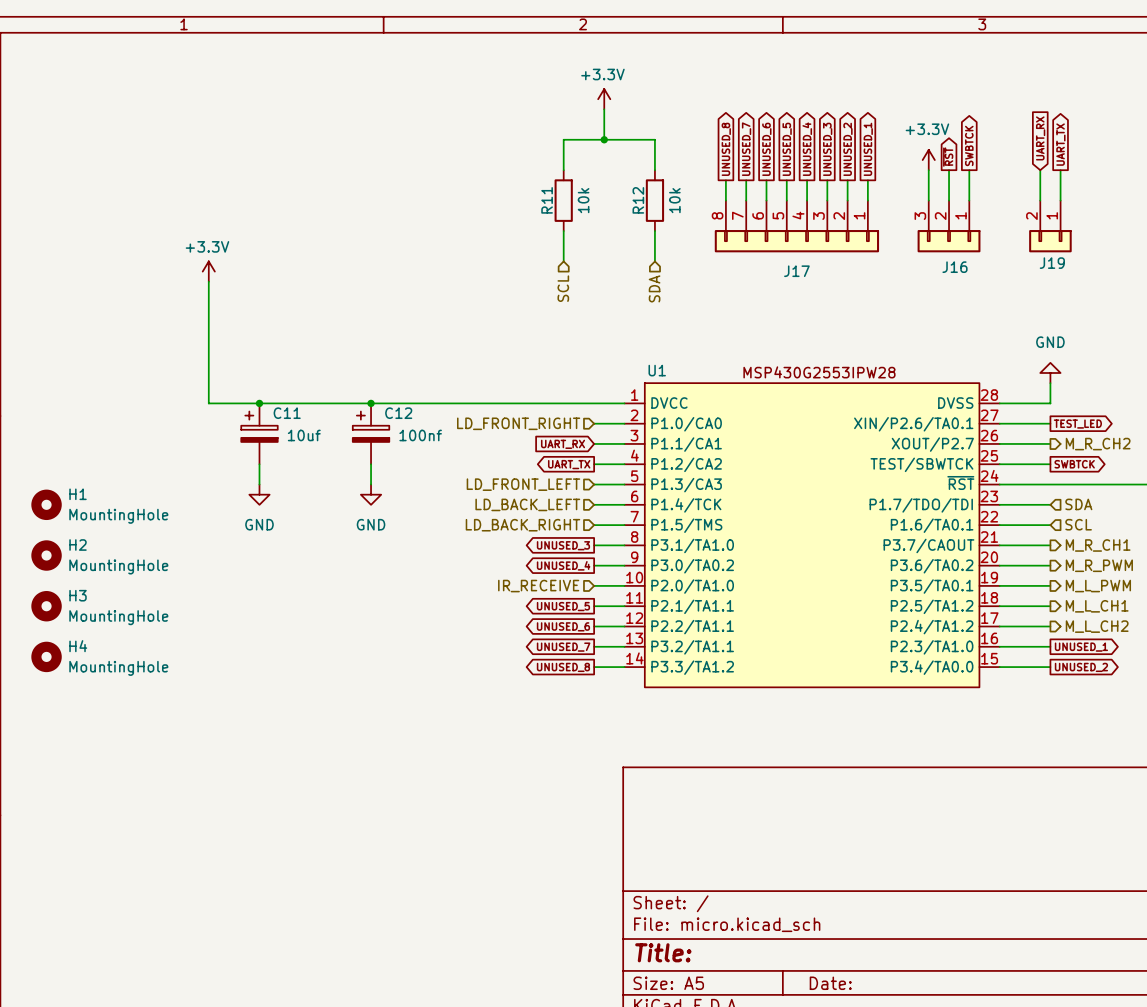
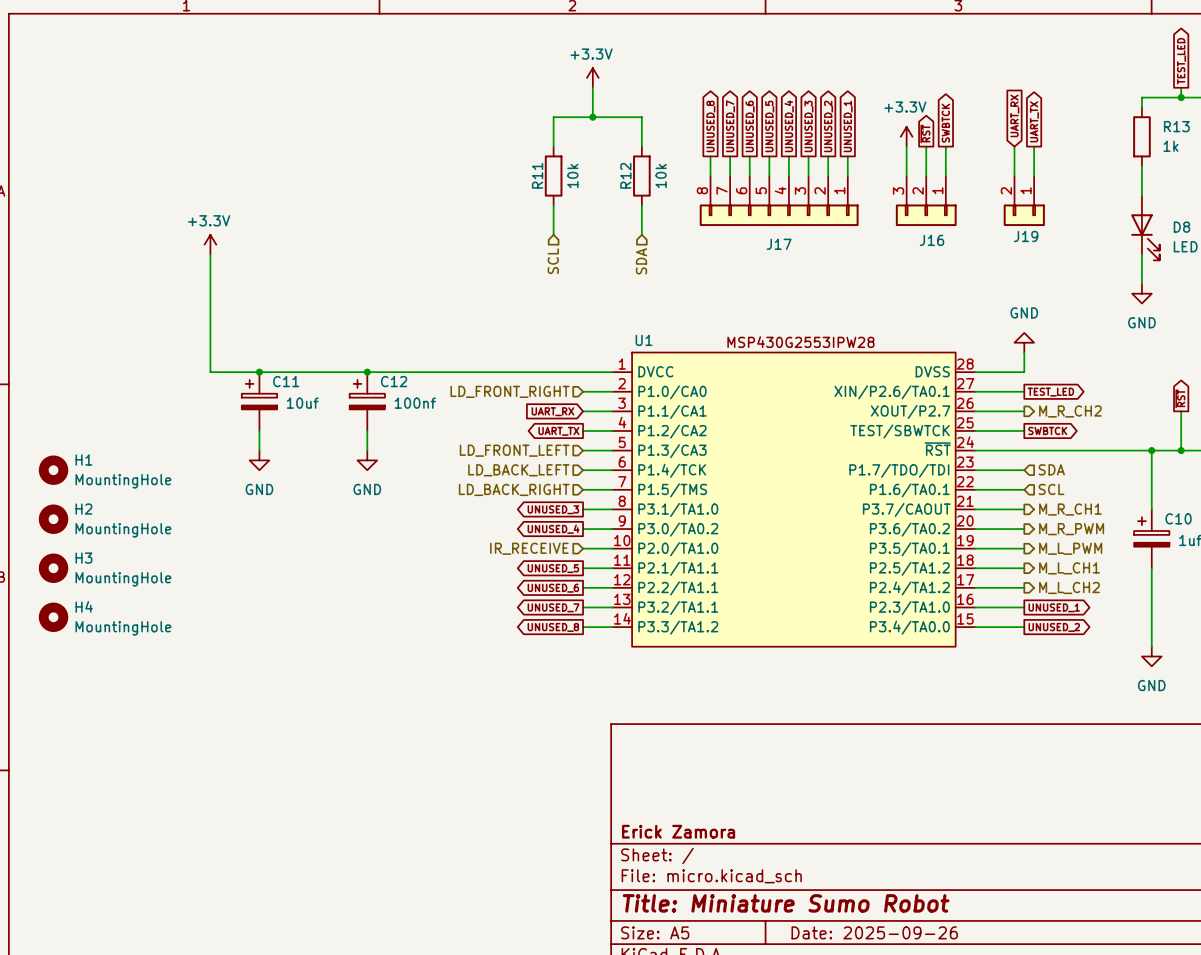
title block: none -> Erick Zamora (678, 831)
title block: Title: (663, 952) -> Title: Miniature Sumo Robot (786, 903)
title block: Date: (830, 983) -> Date: 2025-09-26 (874, 932)

